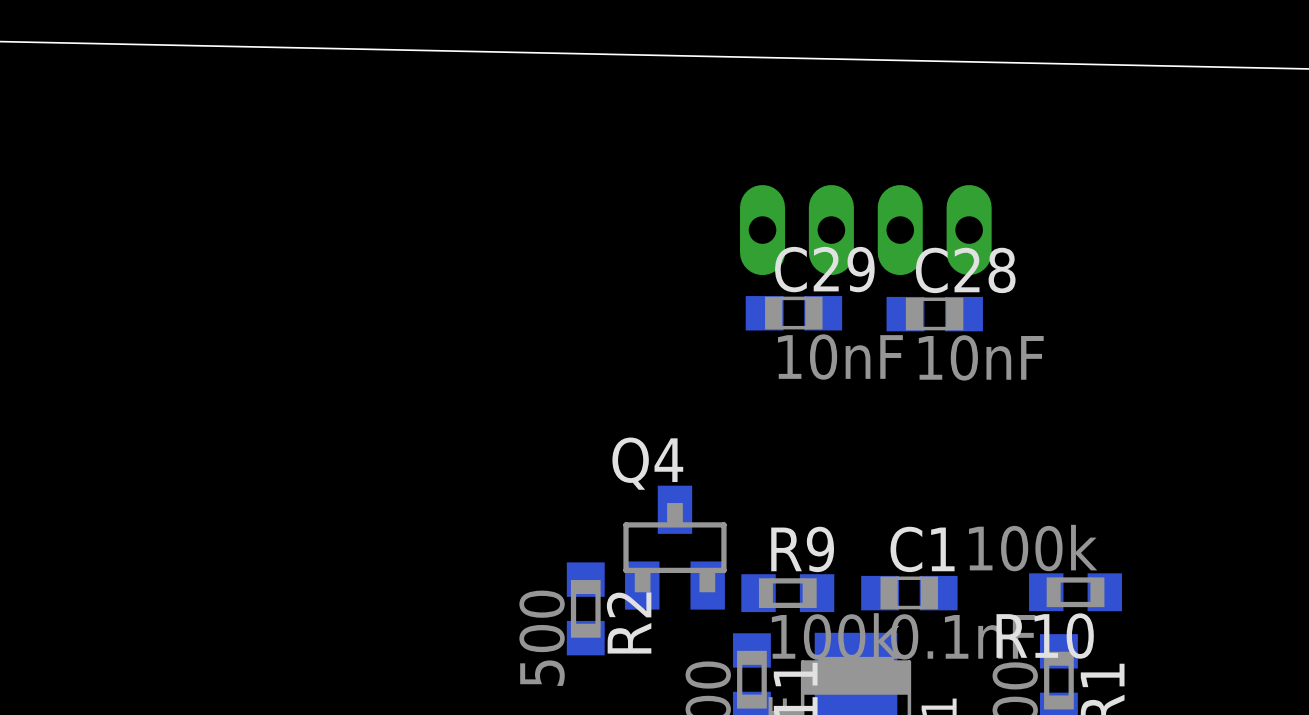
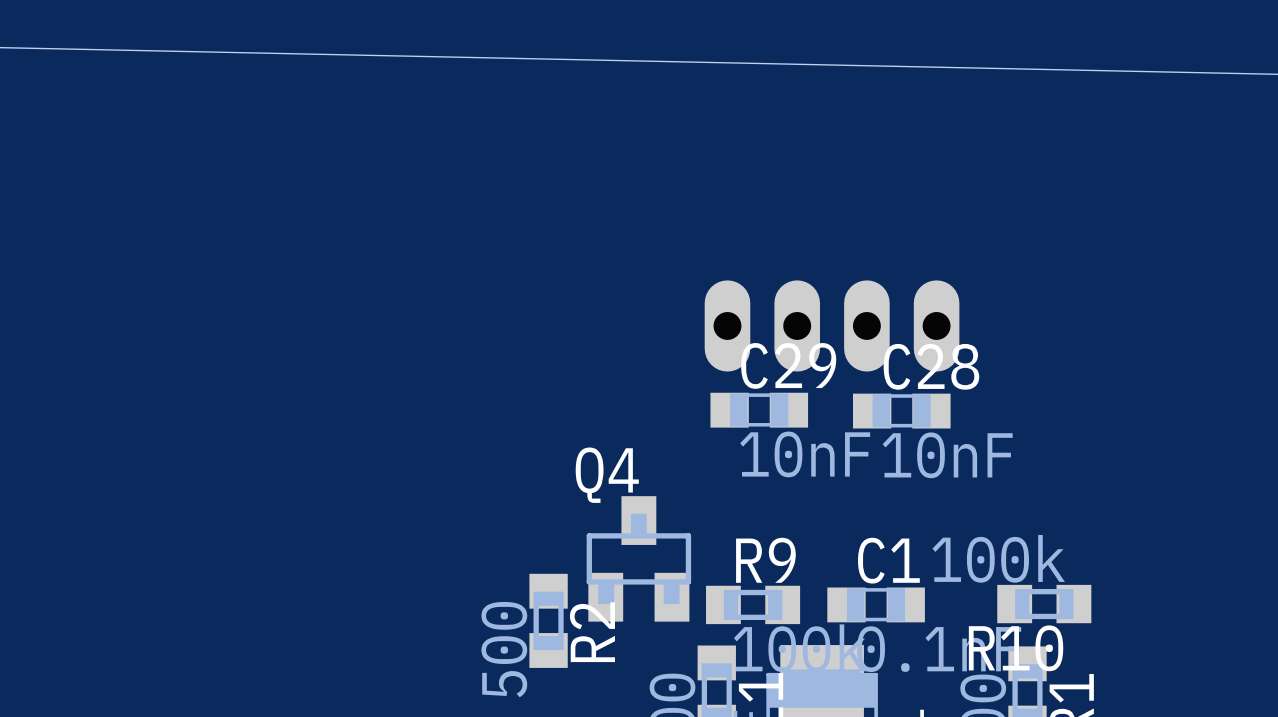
part position: (865, 230) -> (832, 325)
C29 position: (793, 313) -> (759, 410)
C28 position: (934, 314) -> (901, 411)

